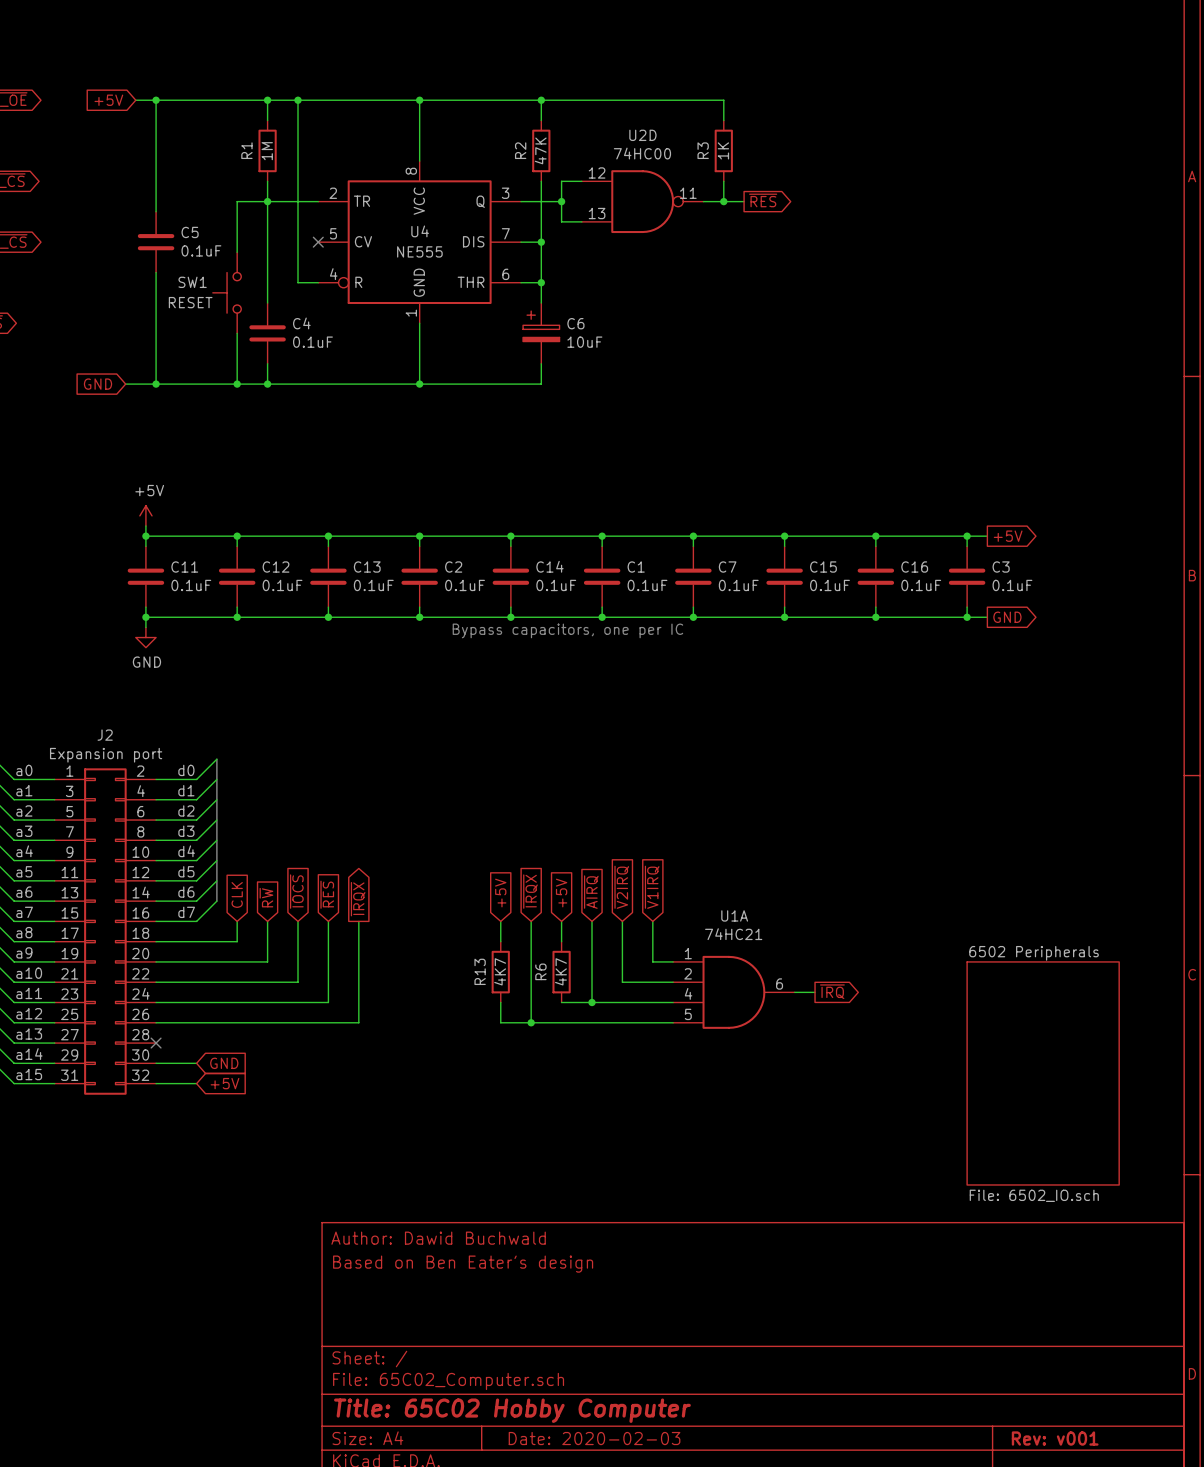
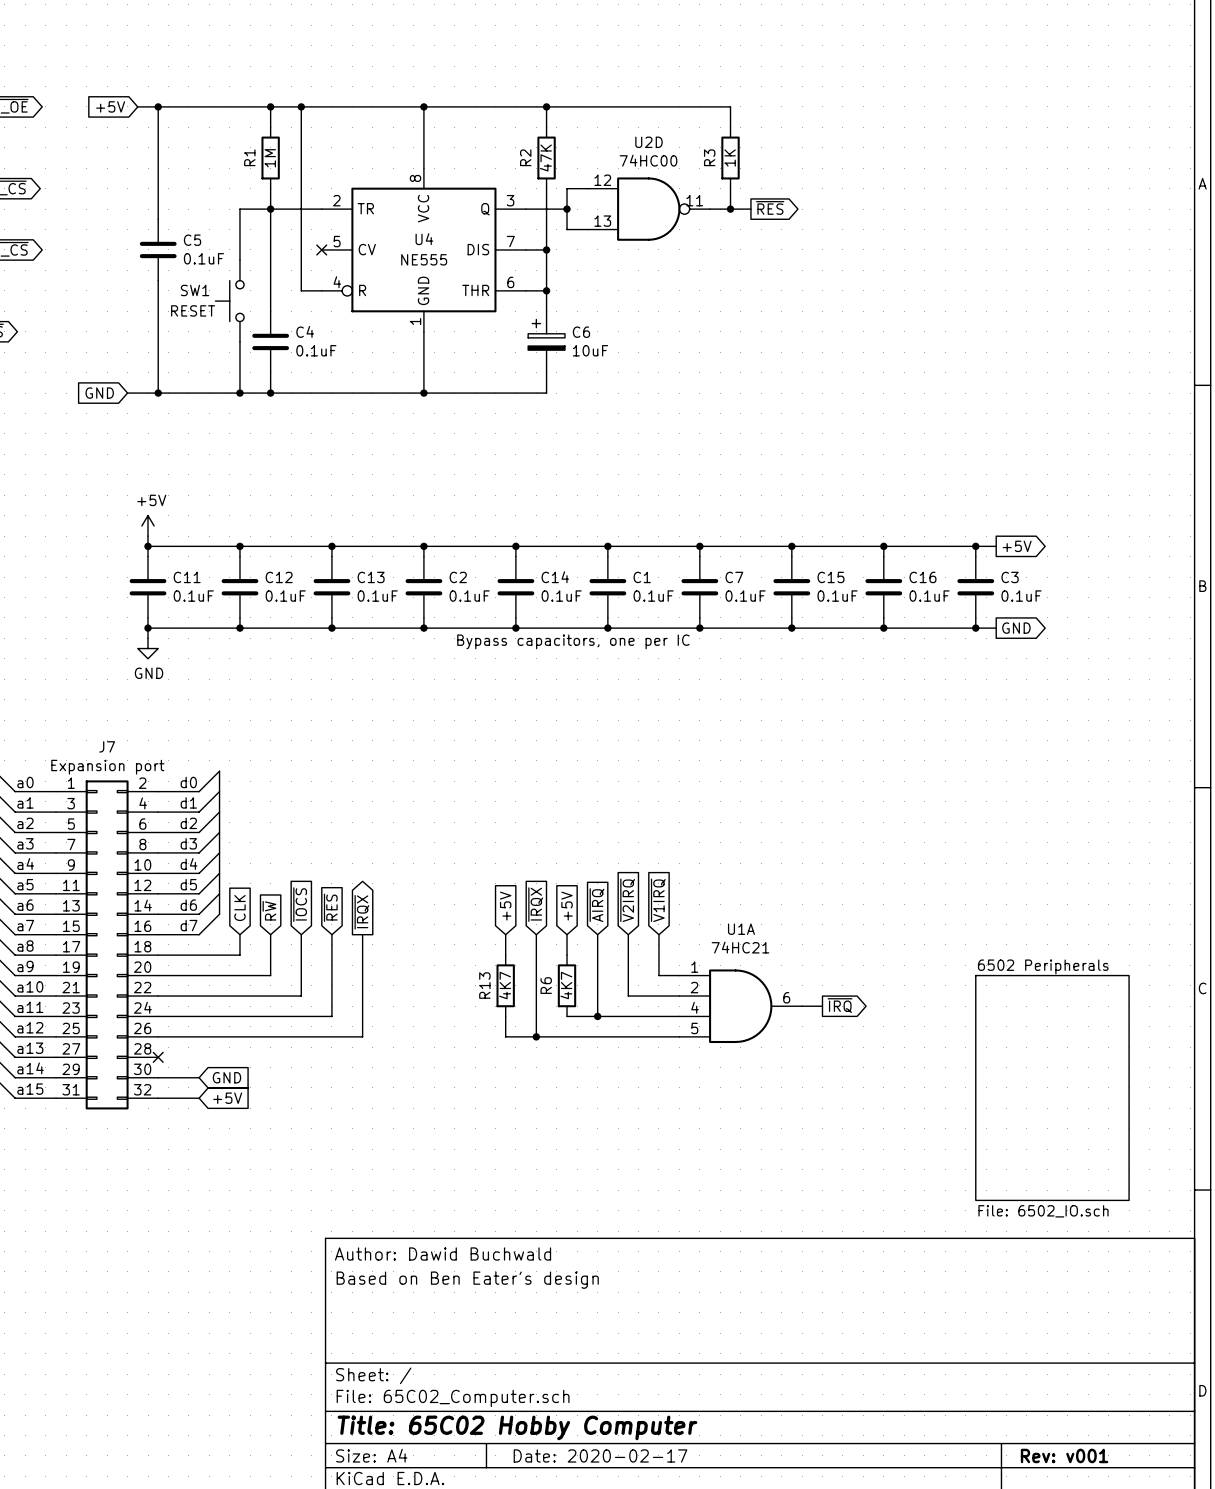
J2 name: J2 (105, 735) -> J7 (107, 746)
title block: Date: 2020-02-03 (594, 1438) -> Date: 2020-02-17 (600, 1455)

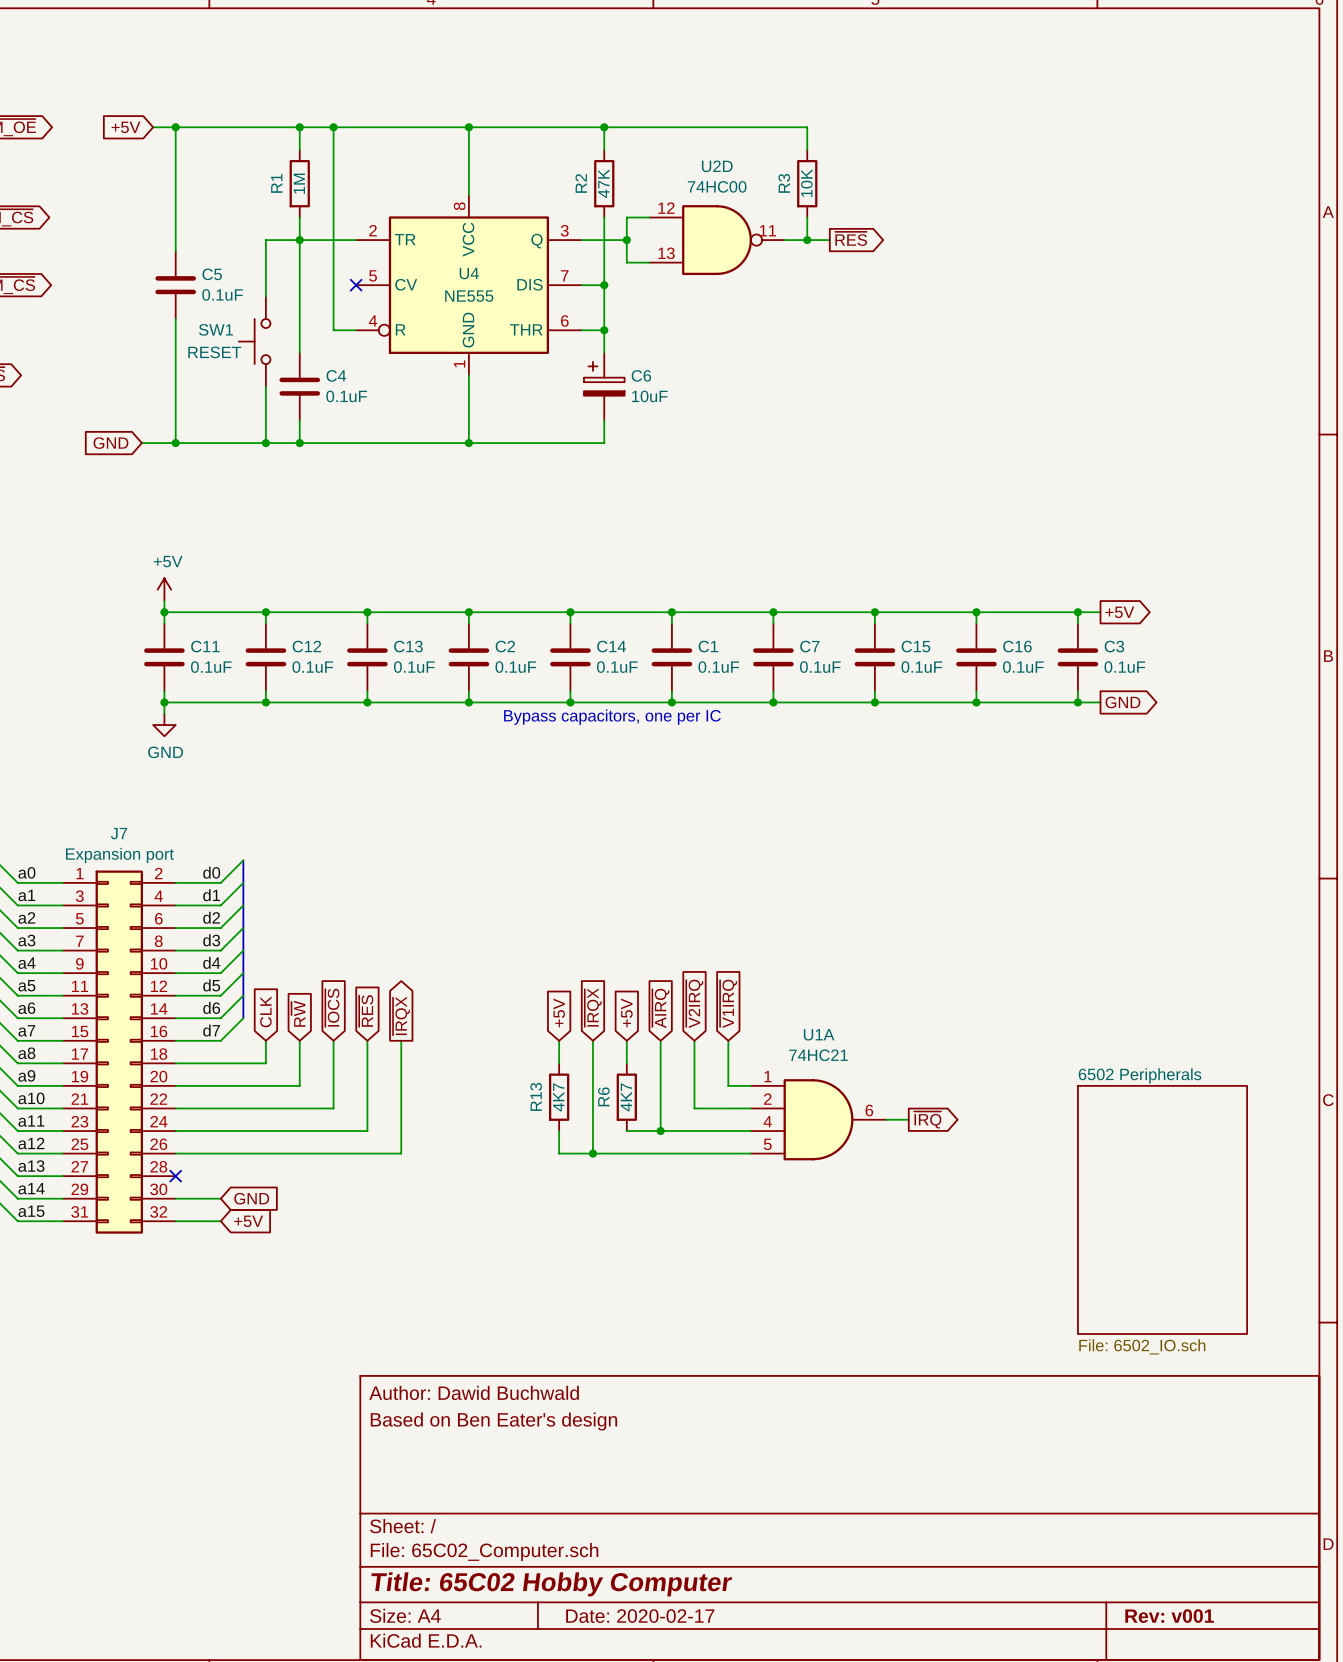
R3 value: 1K (730, 158) -> 10K (806, 183)

